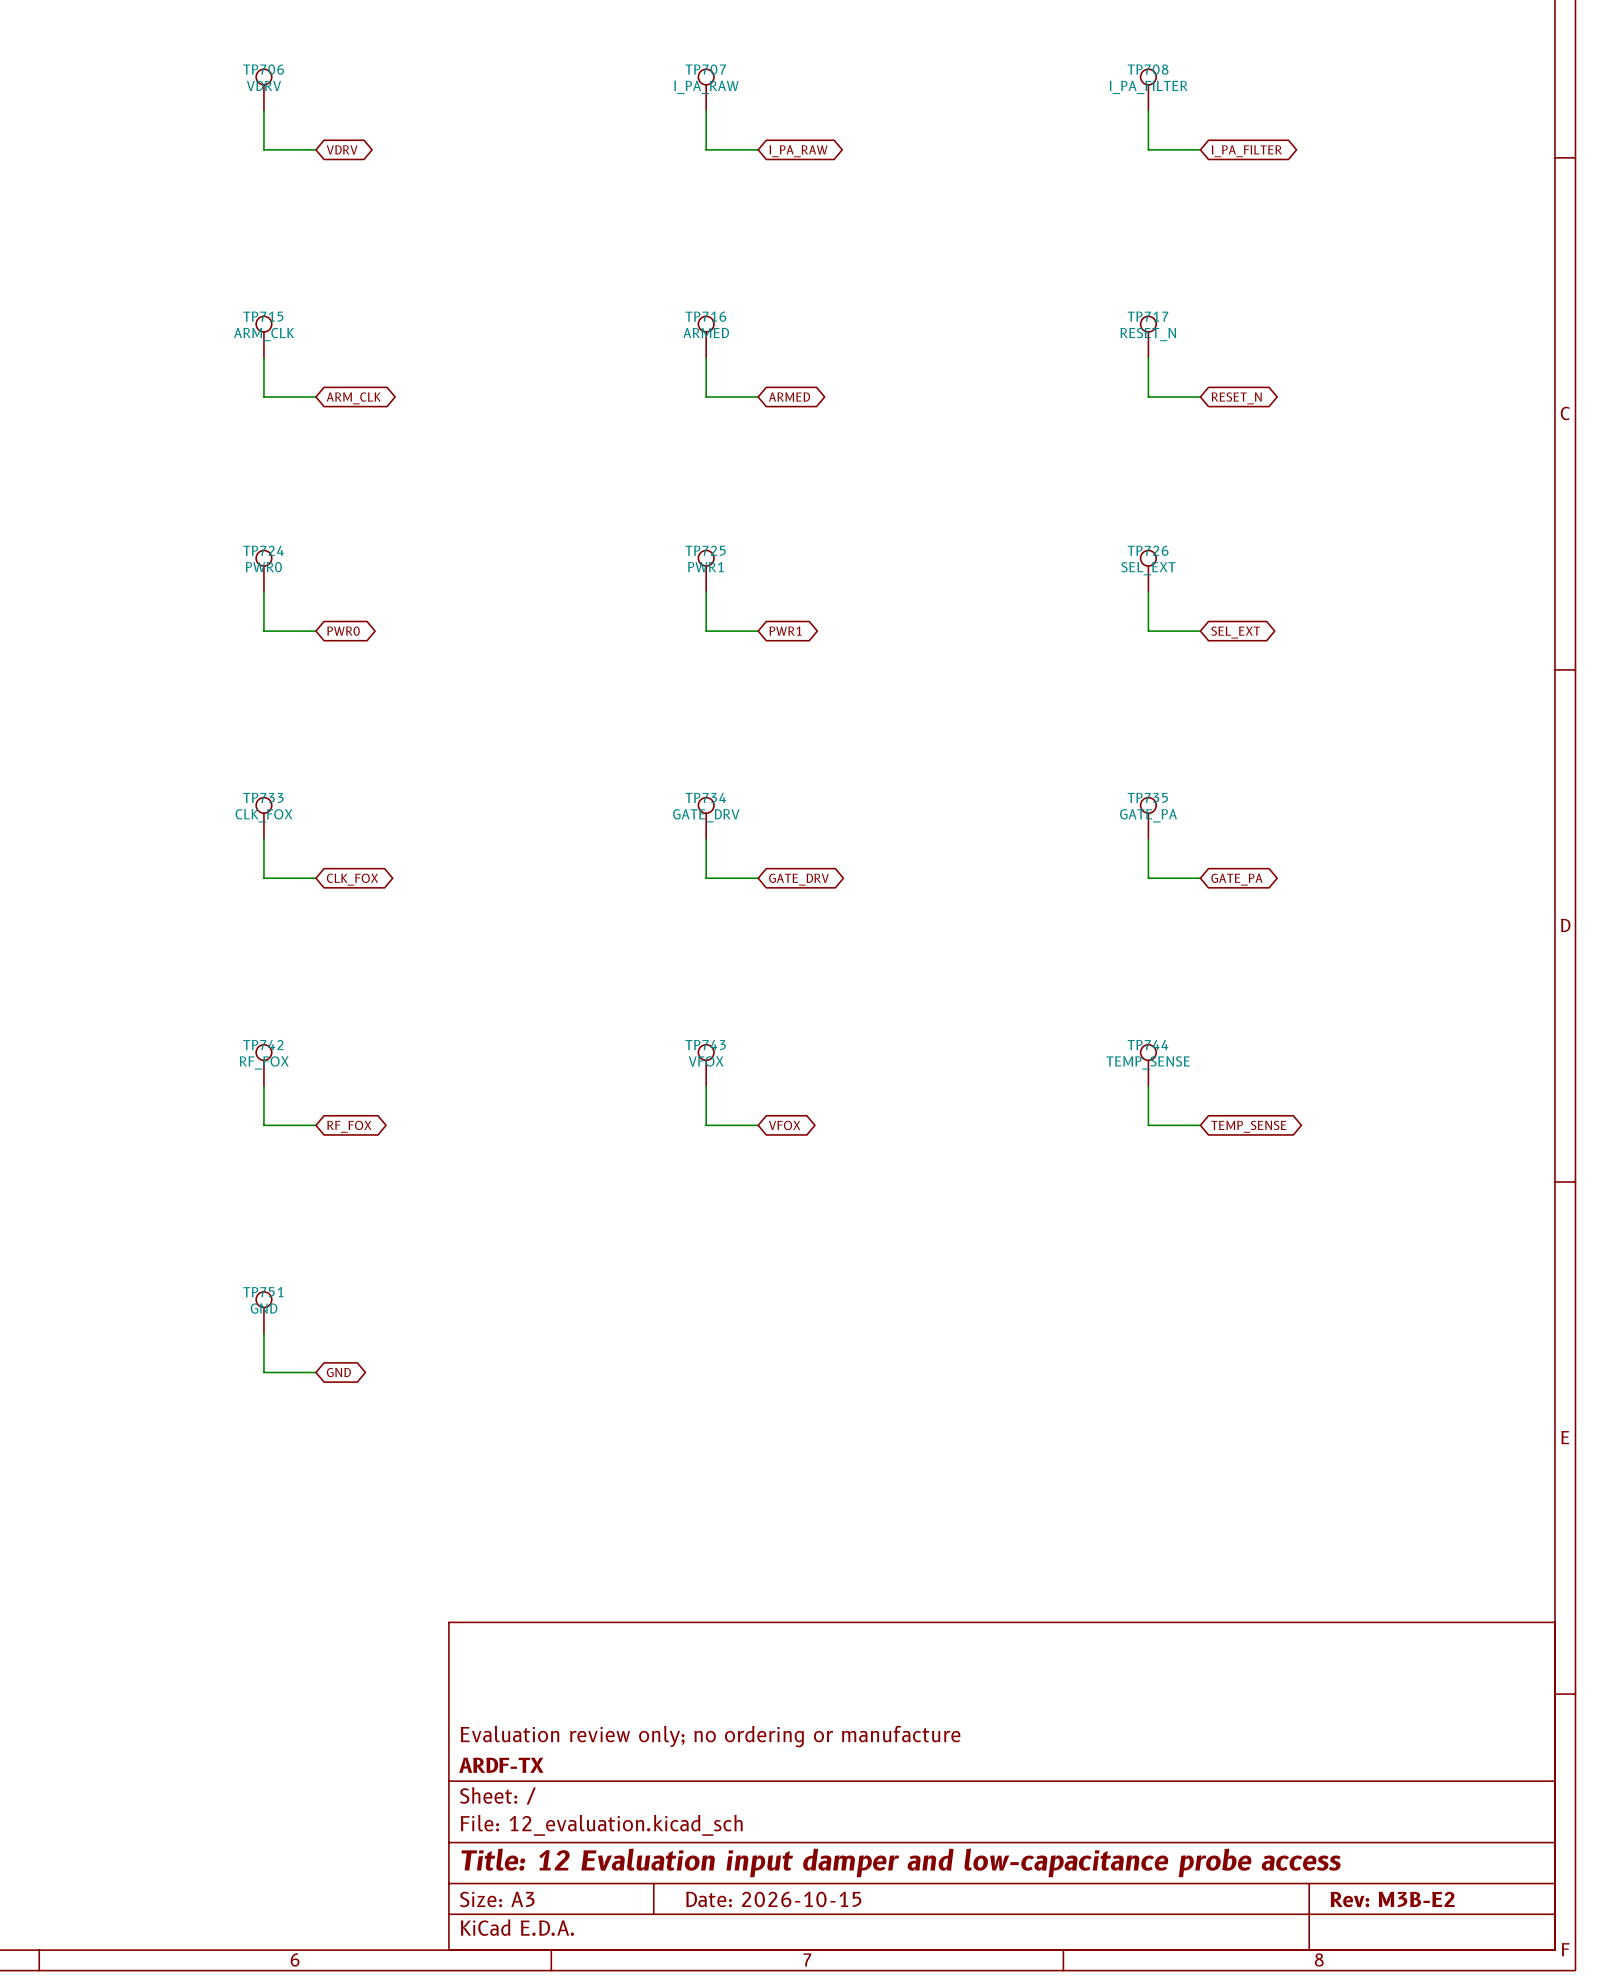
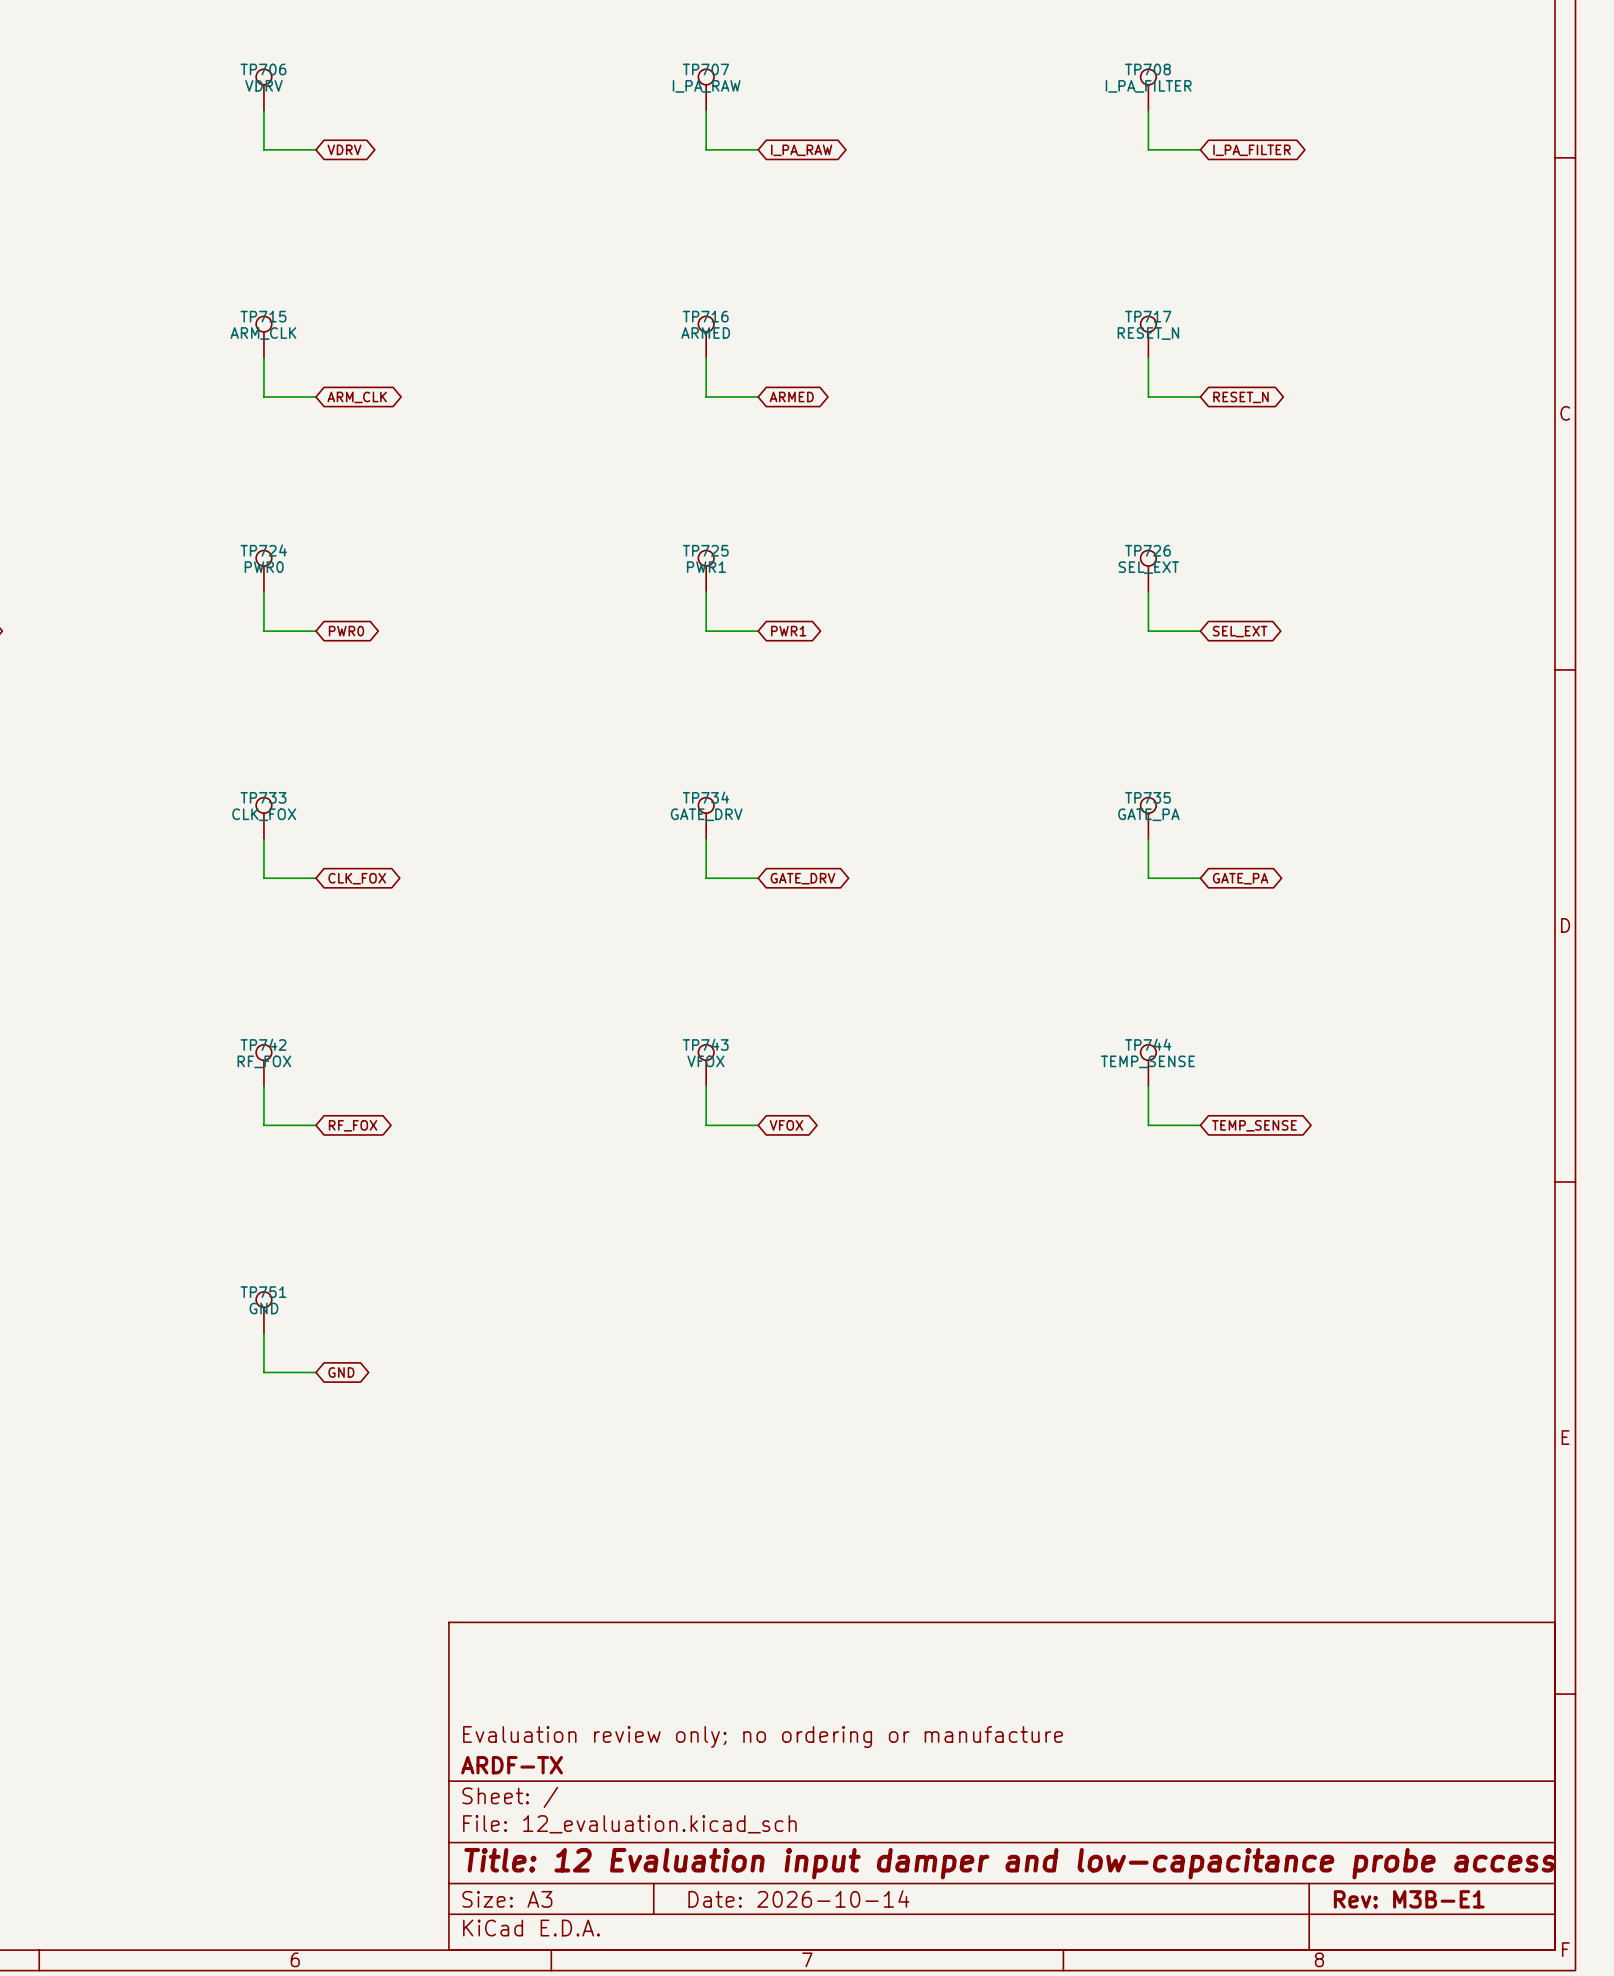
title block: Date: 2026-10-15 (773, 1899) -> Date: 2026-10-14 (798, 1898)
title block: Rev: M3B-E2 (1392, 1899) -> Rev: M3B-E1 (1409, 1899)

